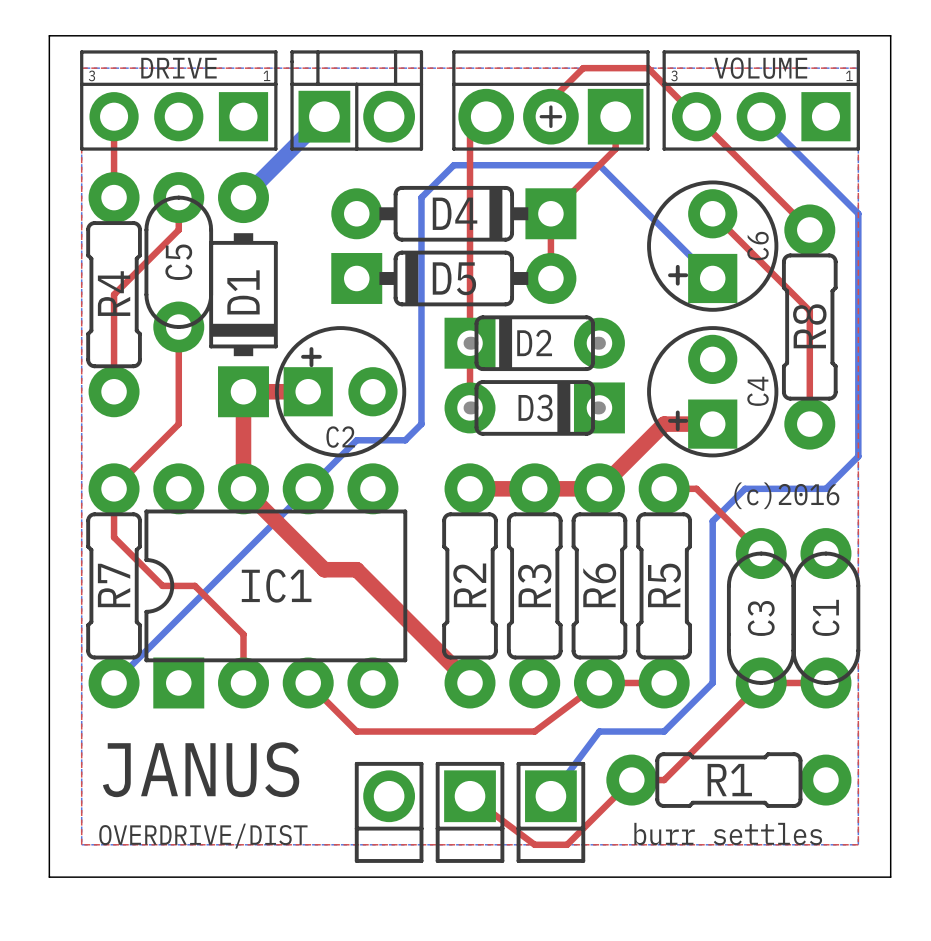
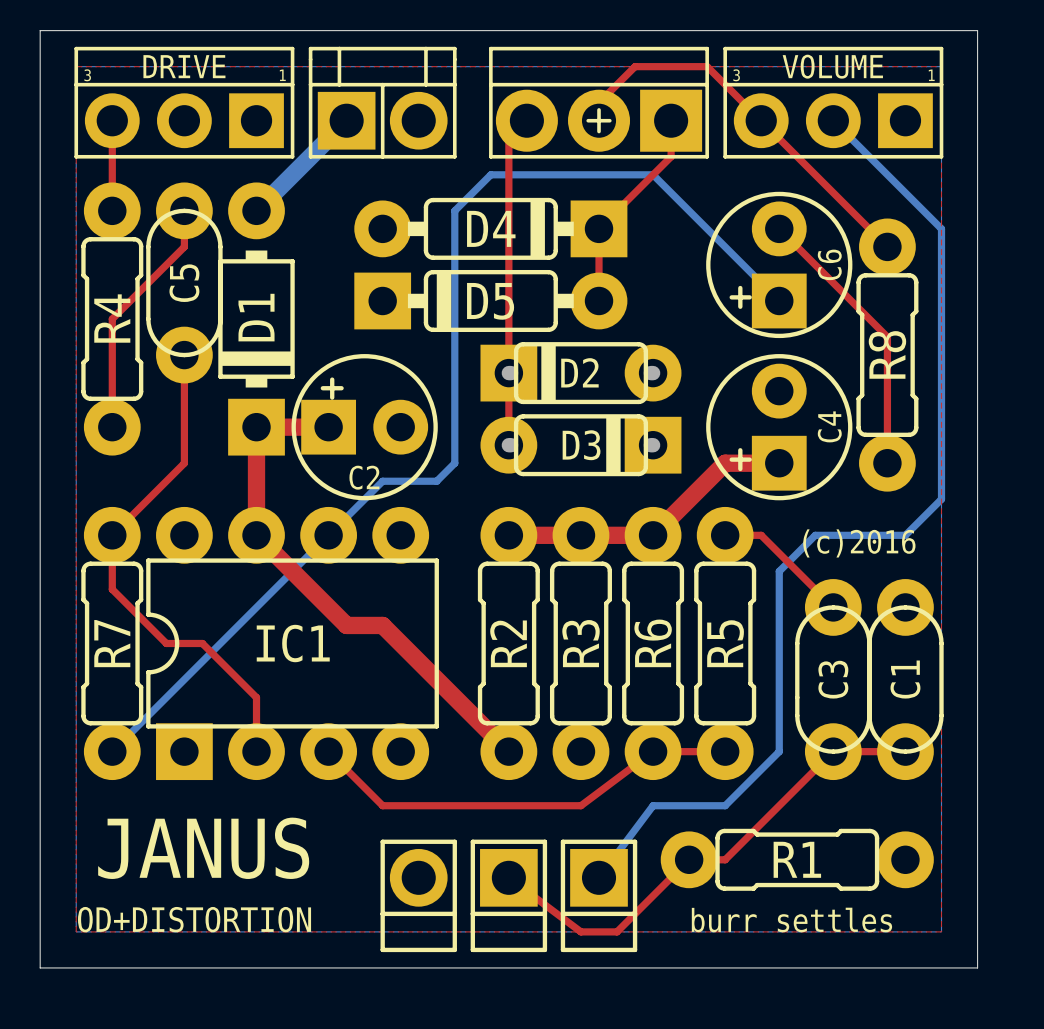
text: OVERDRIVE/DIST (203, 836) -> OD+DISTORTION (194, 919)

